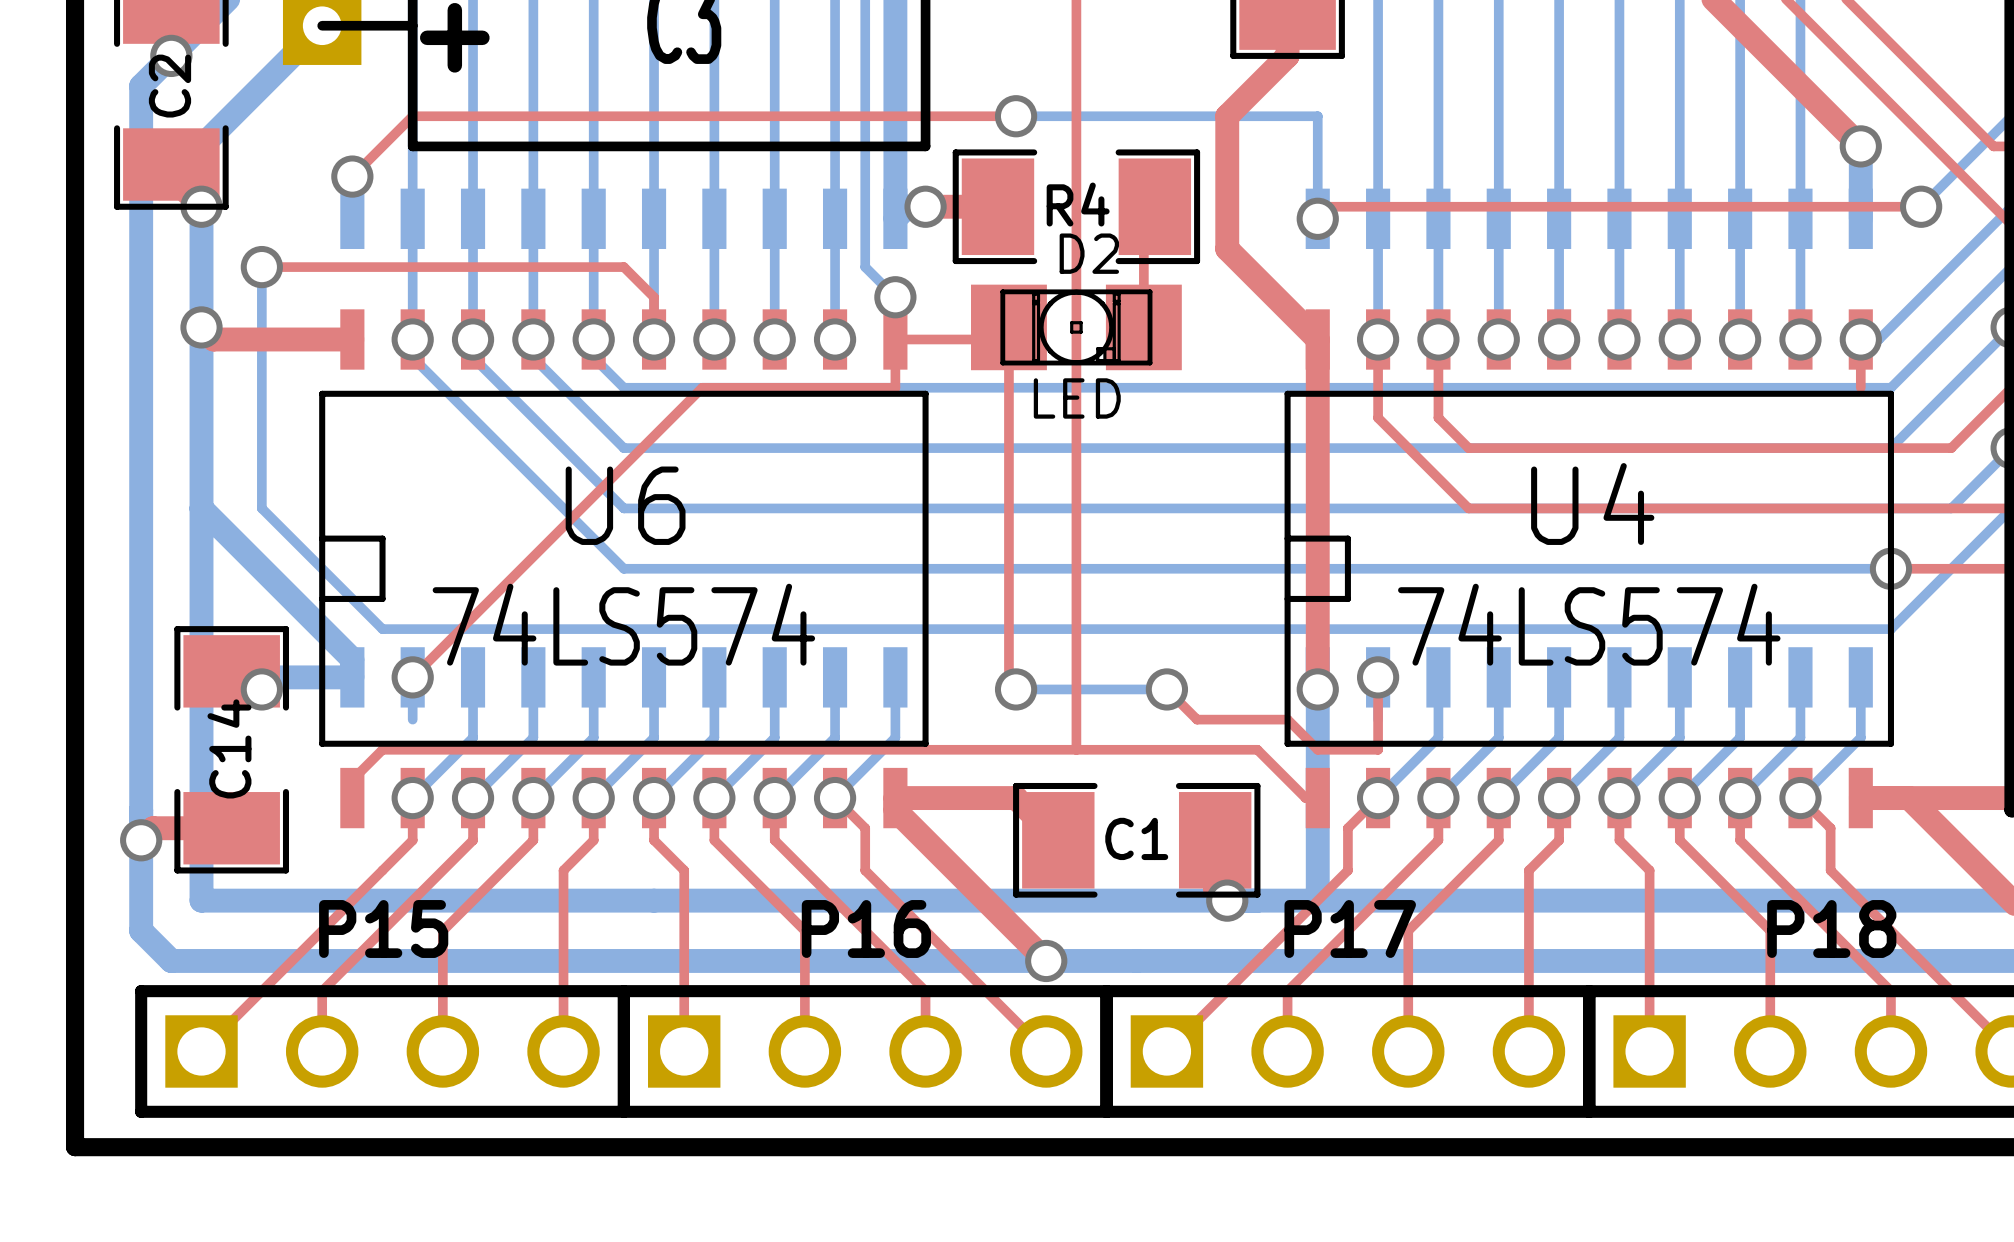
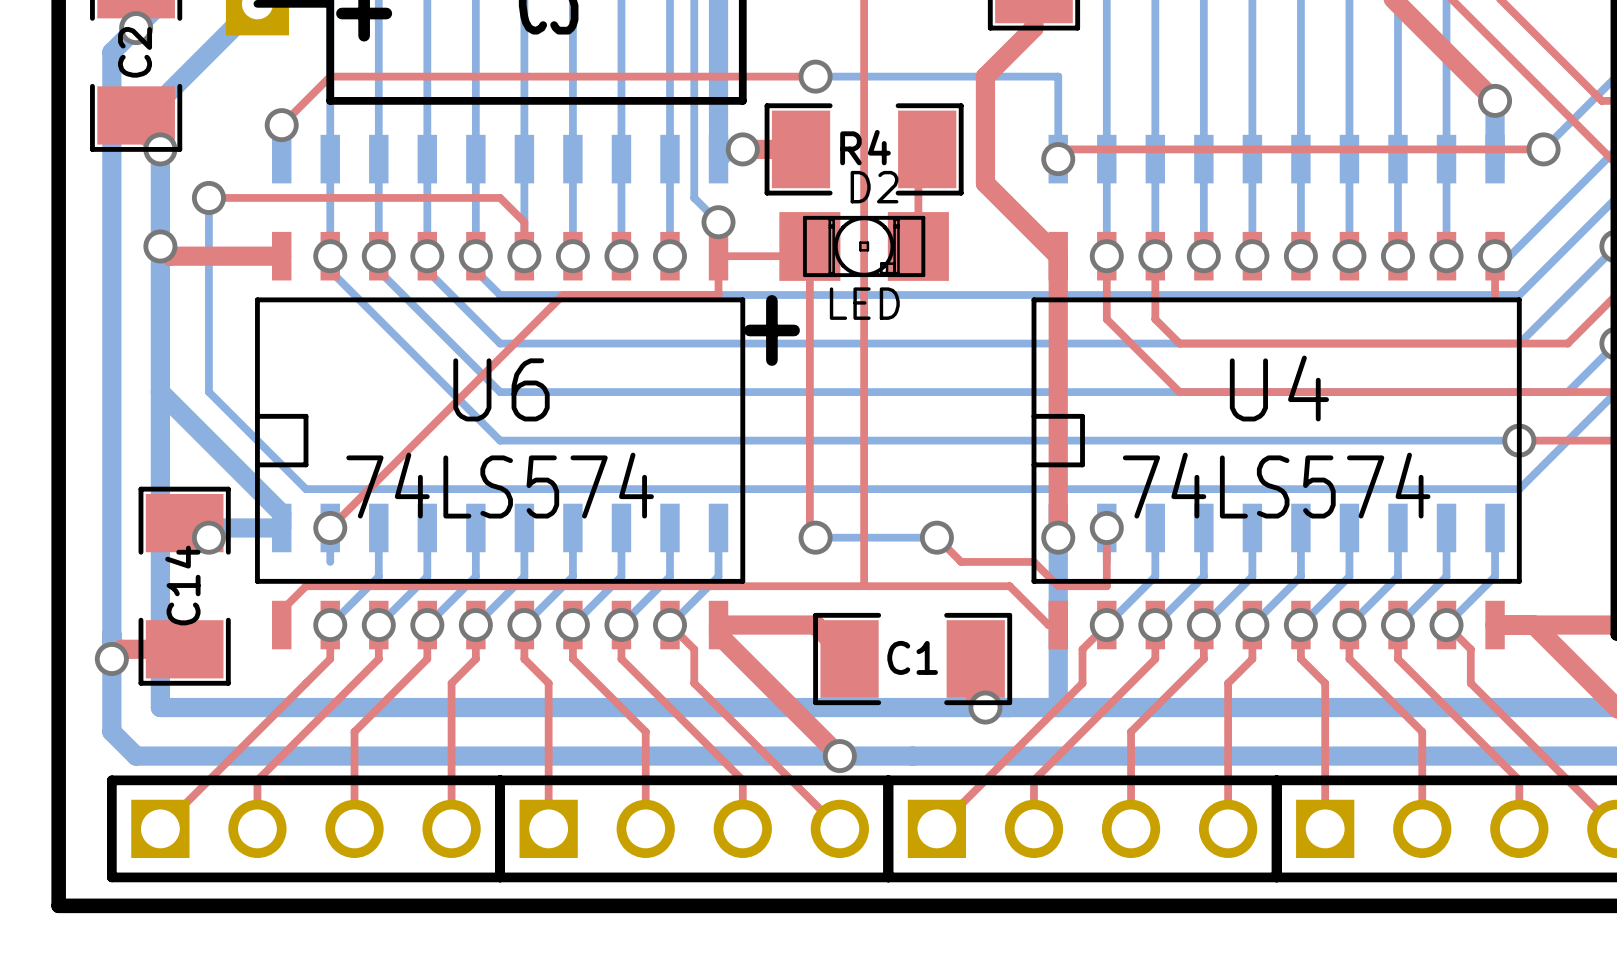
text: none -> + (771, 330)
P15 name: P15 (383, 928) -> none
P16 name: P16 (866, 928) -> none
P17 name: P17 (1350, 928) -> none
P18 name: P18 (1831, 928) -> none

